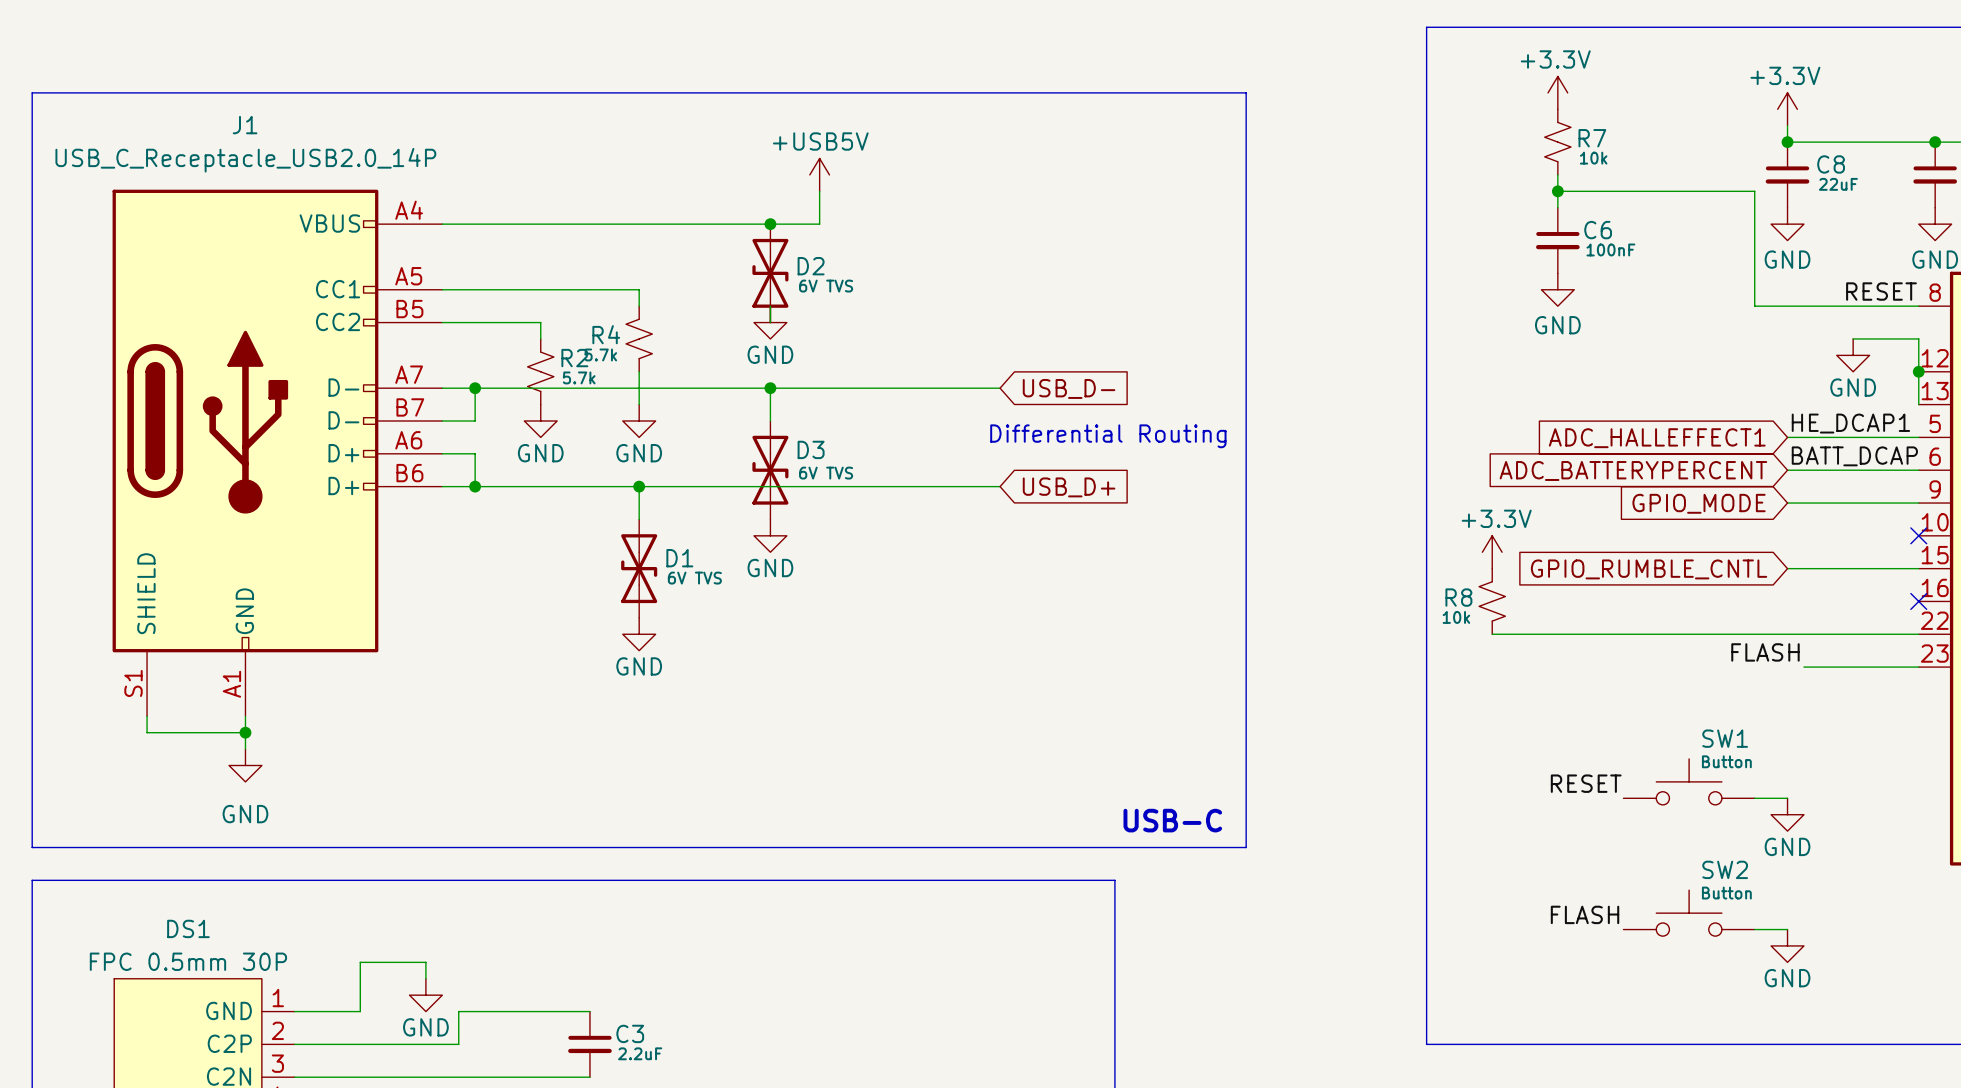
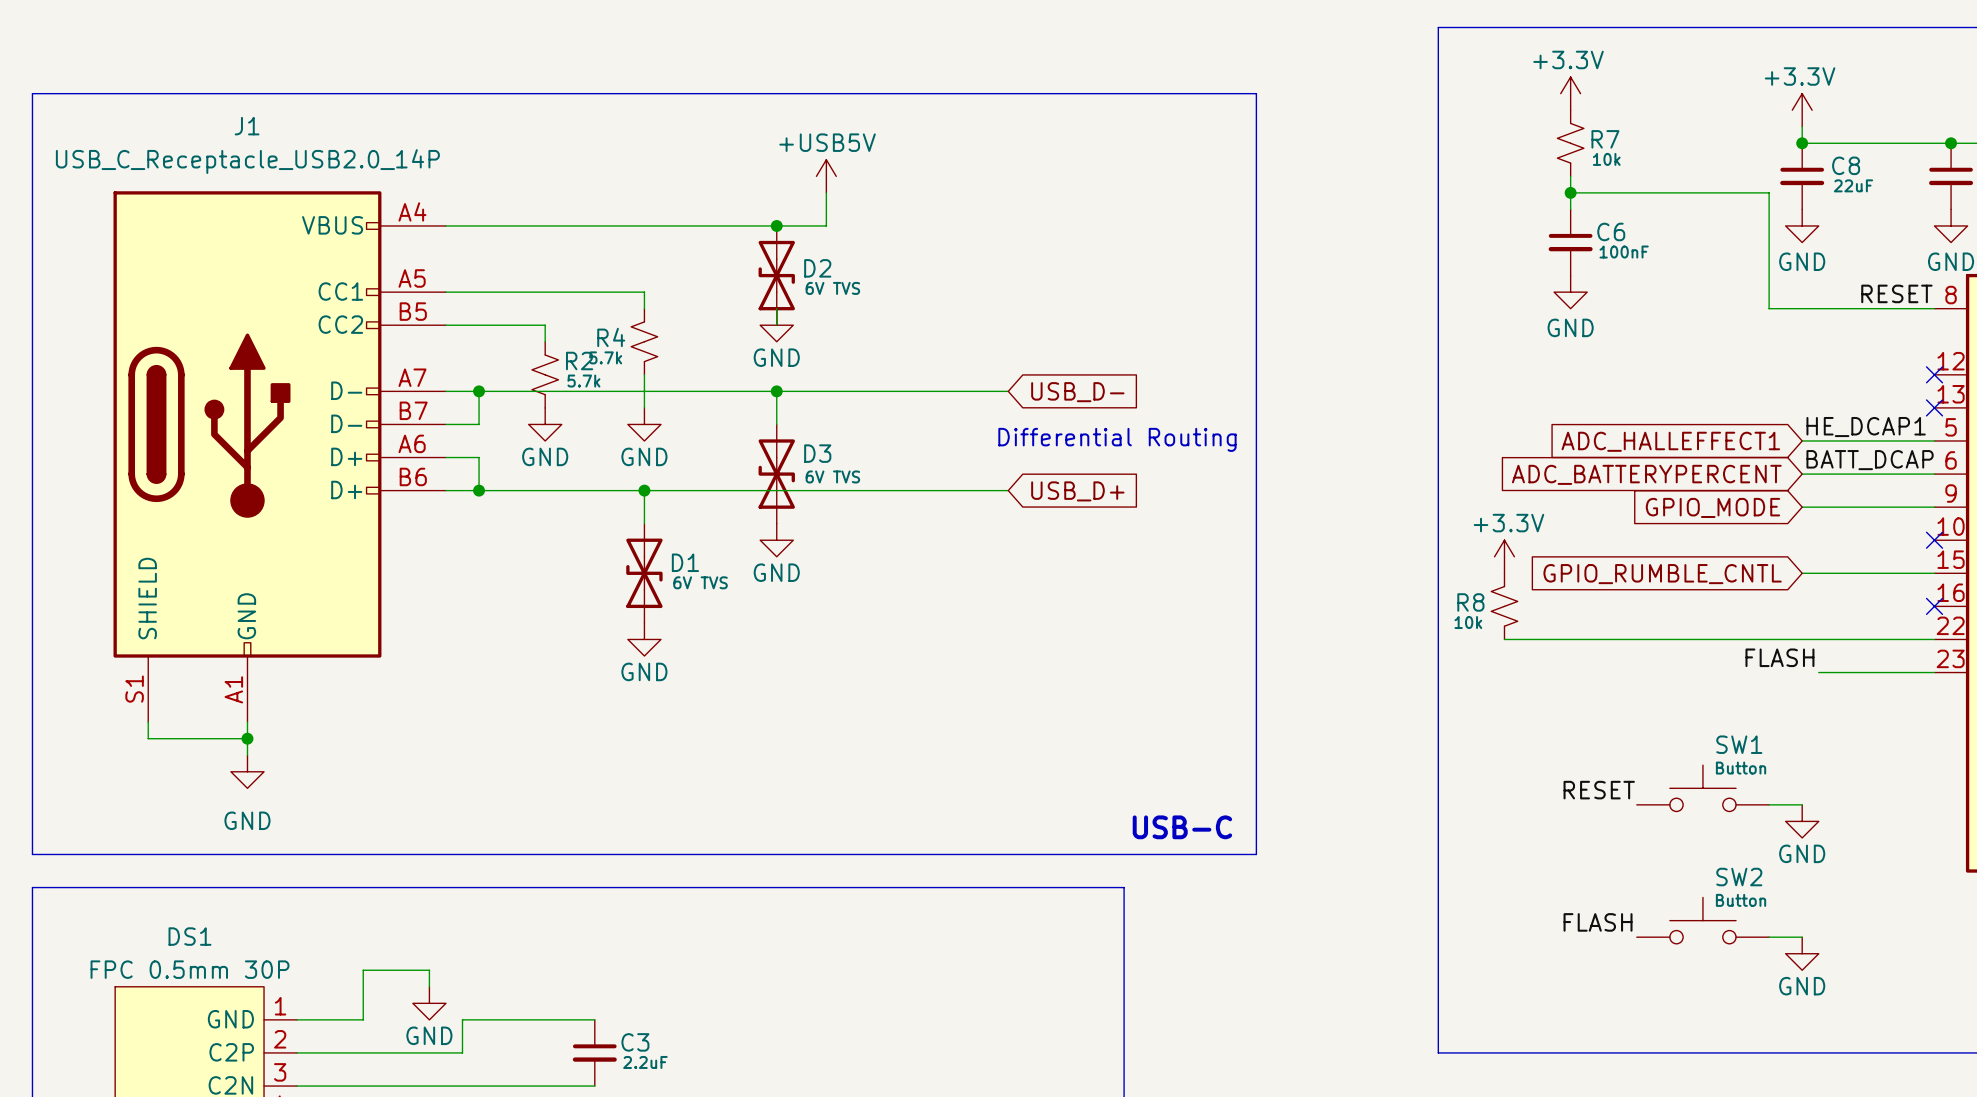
wire: (1853, 338) (1918, 338) (1918, 404) -> none
power symbol: GND (1853, 355) -> none
junction: (1918, 371) -> none
no-connect mark: none -> (1934, 374)
no-connect mark: none -> (1934, 407)

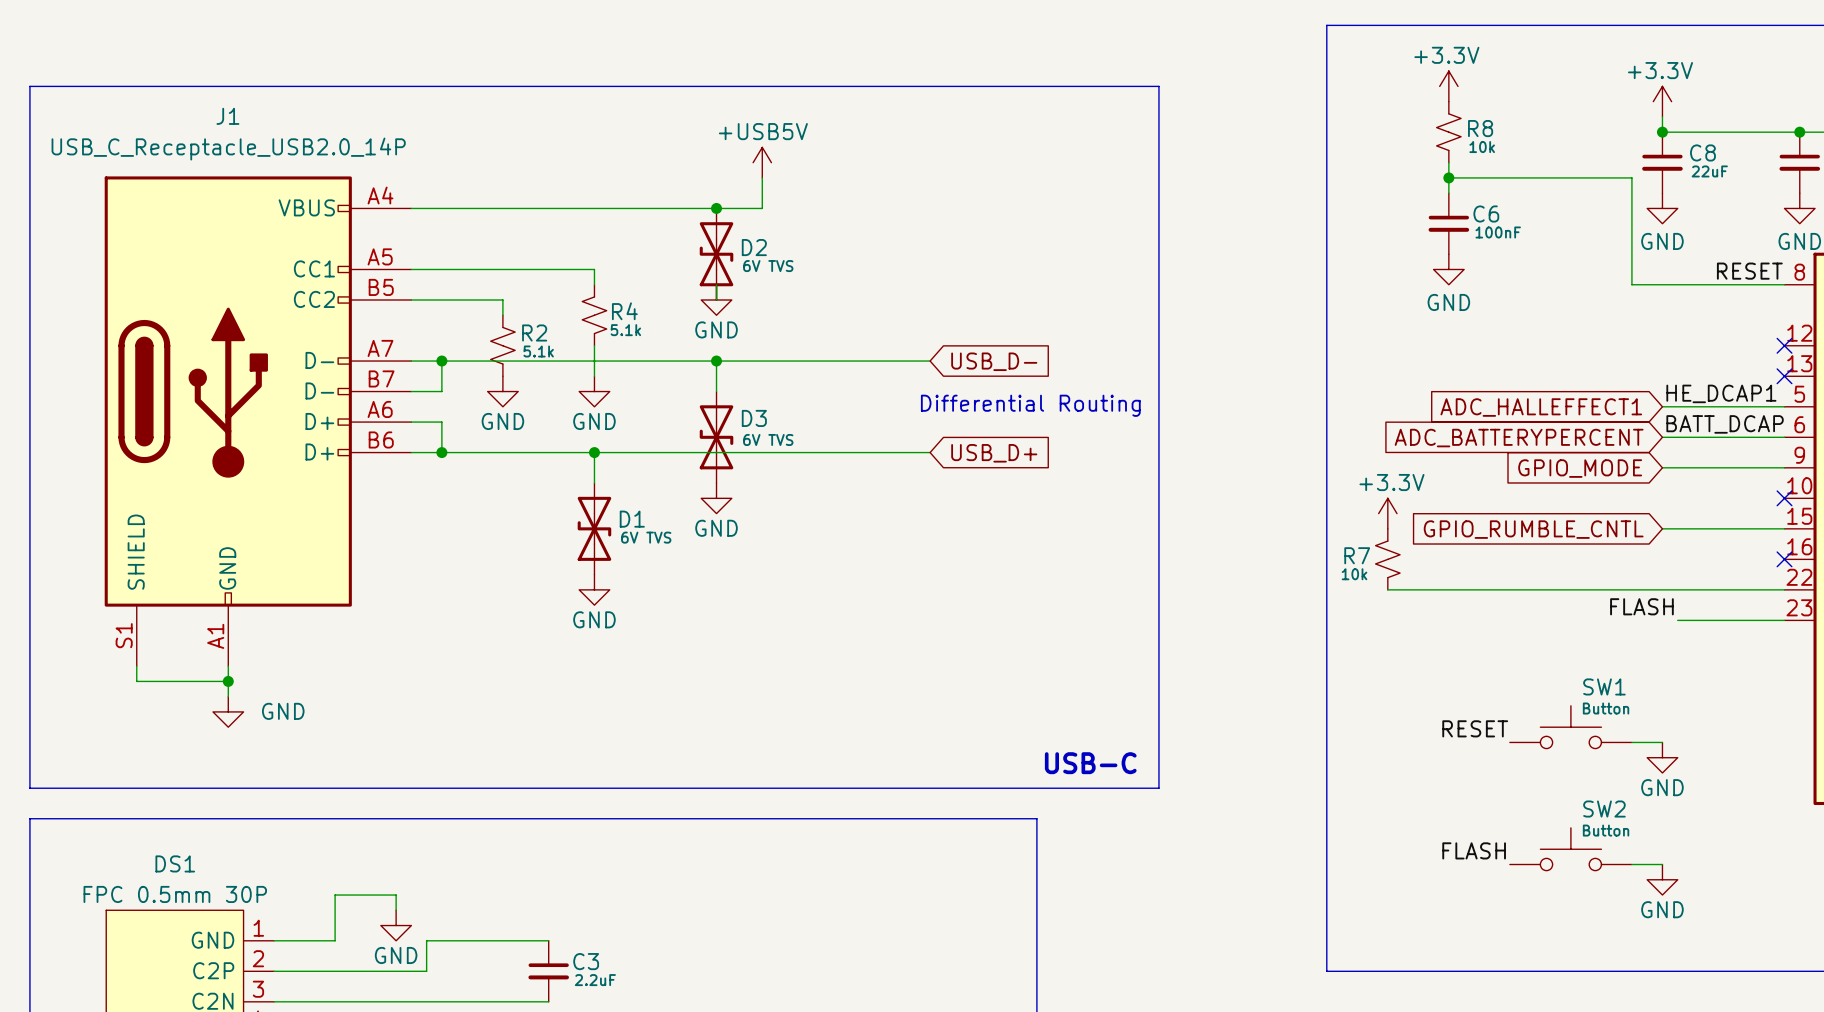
R7 name: R7 (1605, 139) -> R8 (1480, 128)
R4 name position: R4 (611, 337) -> R4 (624, 311)
R4 value: 5.7k (605, 357) -> 5.1k (625, 330)
R2 value: 5.7k (583, 381) -> 5.1k (538, 351)
R8 name: R8 (1470, 602) -> R7 (1357, 555)
power symbol text position: GND (247, 820) -> GND (283, 711)

